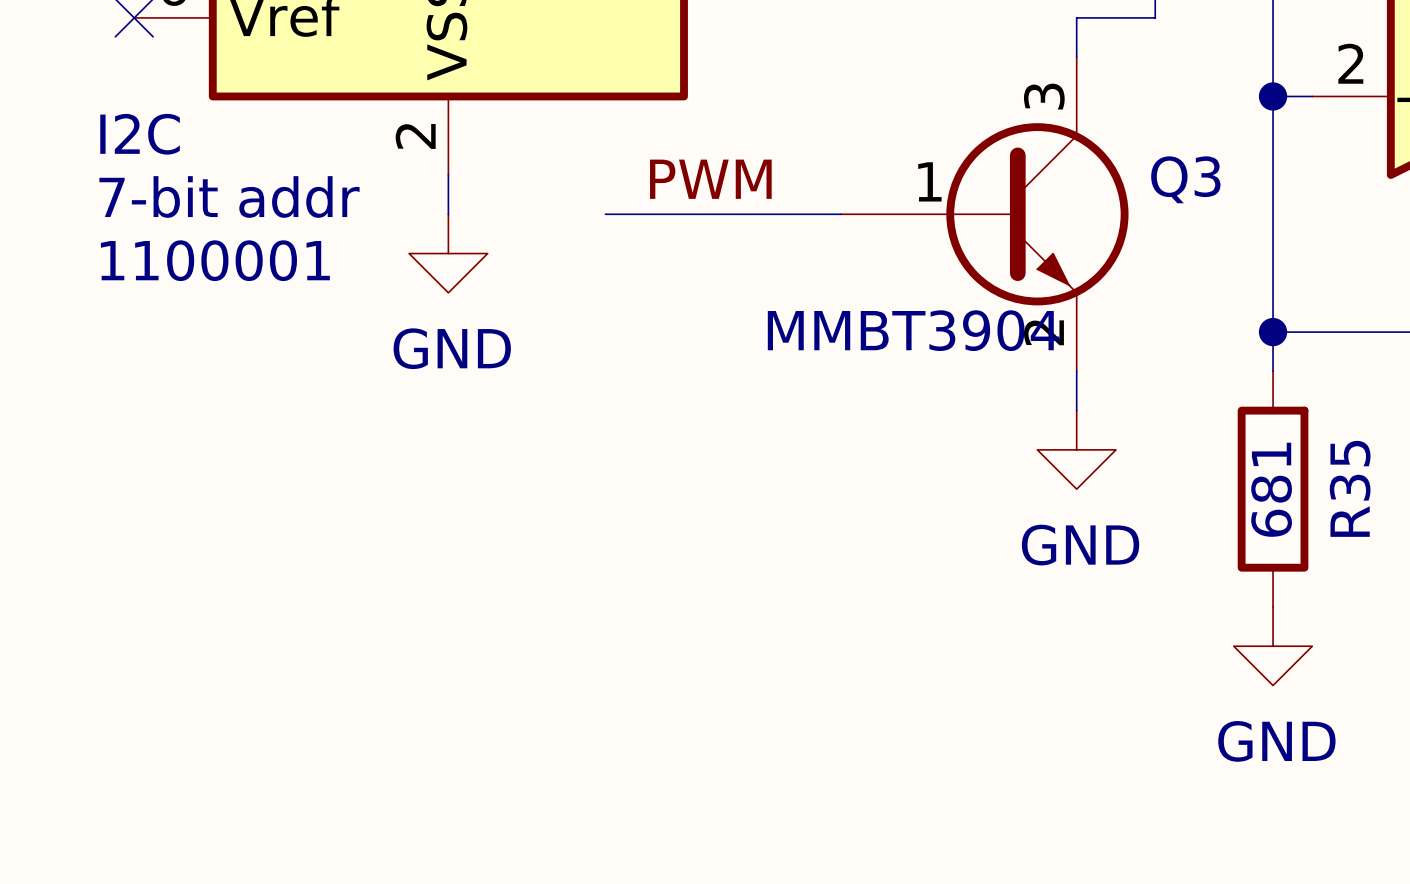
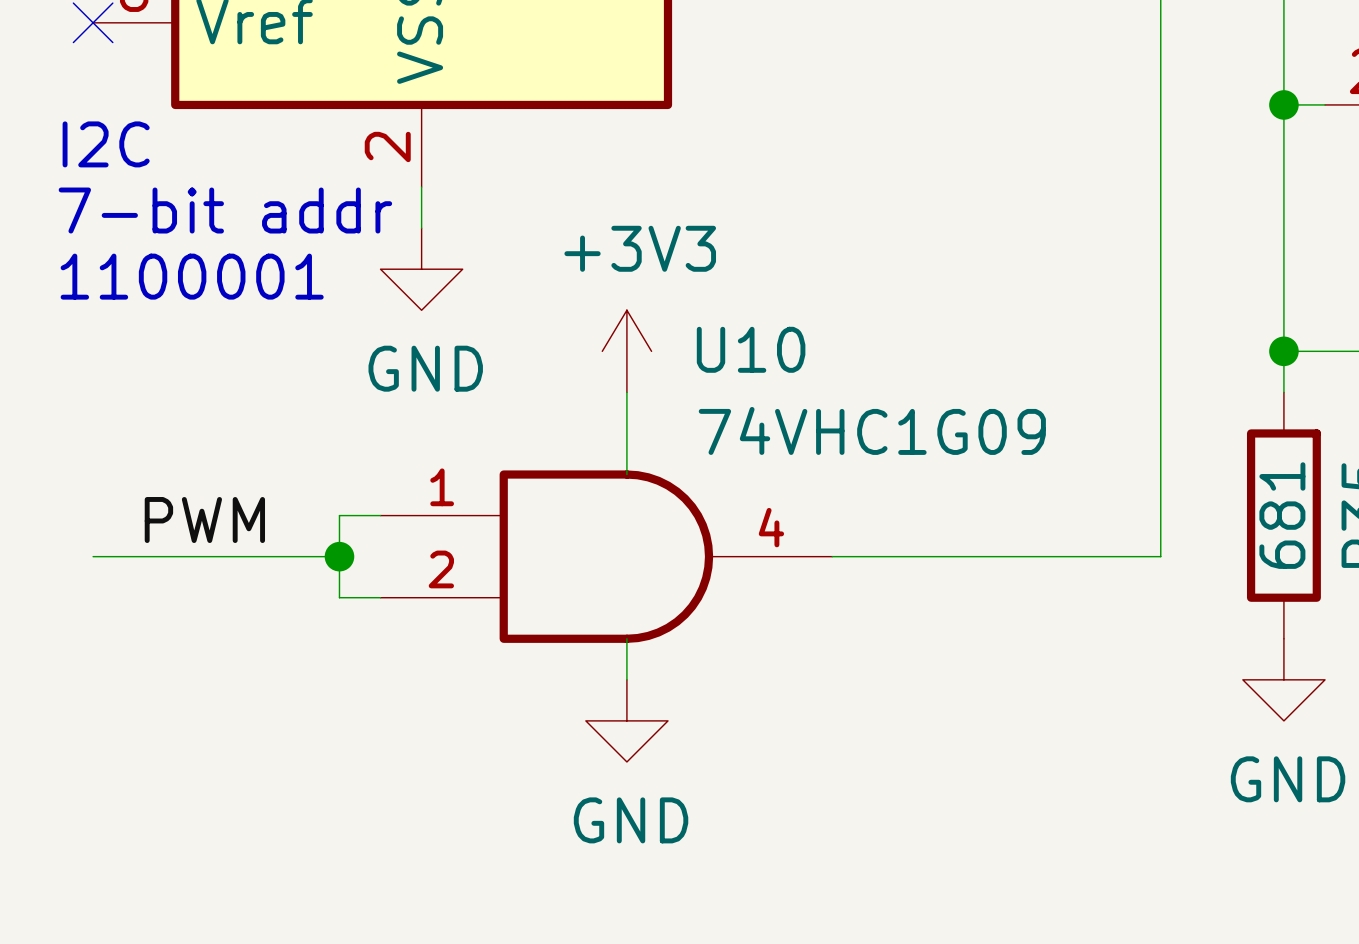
wire: (1155, 17) (1076, 17) (1076, 57) -> (1160, 22) (1160, 556) (832, 556)
label position: PWM (710, 179) -> PWM (204, 520)
wire: (605, 214) (841, 214) -> (93, 556) (339, 556)
Q3: MMBT3904 (984, 214) -> none
power symbol: none -> +3V3 (626, 351)
wire: none -> (626, 392) (626, 474)
wire: (1076, 371) (1076, 410) -> (626, 638) (626, 679)
power symbol position: GND (1076, 449) -> GND (626, 720)
wire: none -> (380, 515) (339, 515) (339, 597) (380, 597)
junction: none -> (339, 556)
U10: none -> 74VHC1G09 (606, 556)

